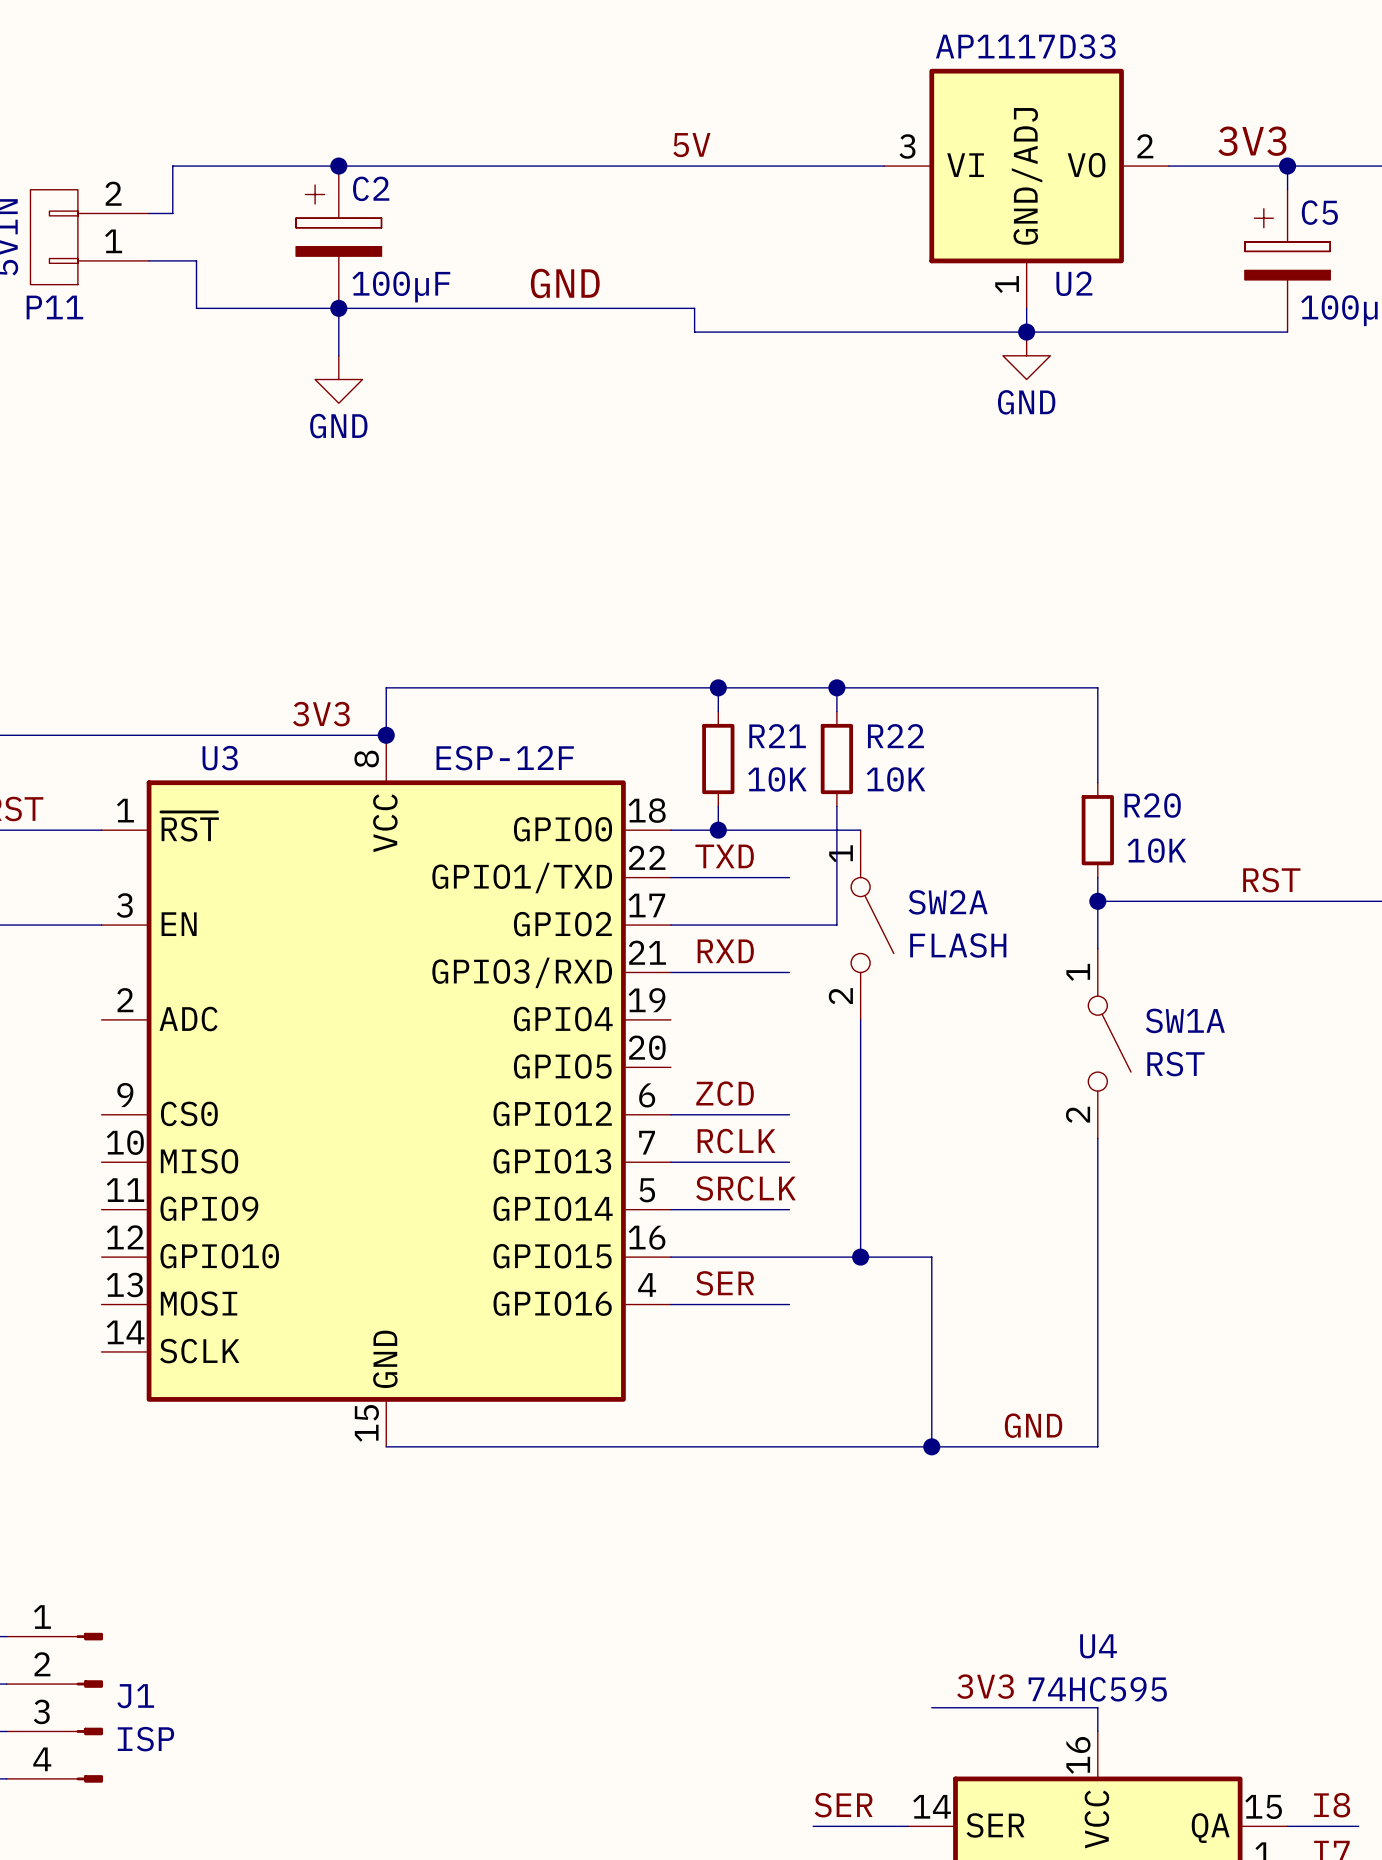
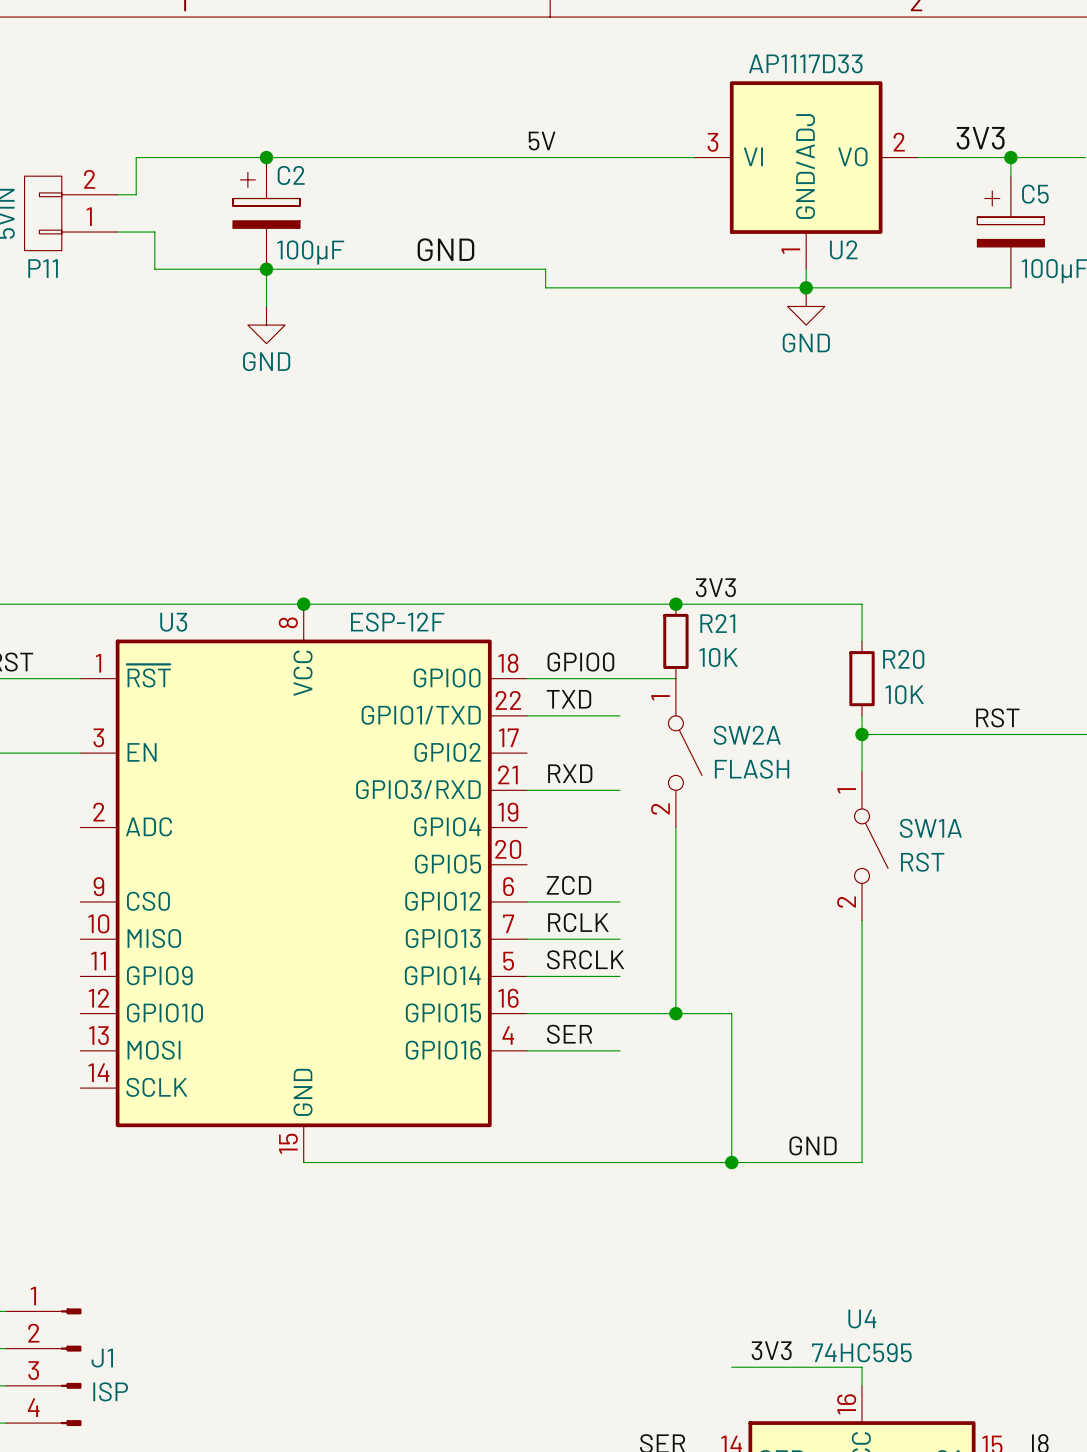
wire: (718, 687) (718, 711) -> none
junction: (718, 687) -> none
wire: (836, 687) (836, 711) -> none
junction position: (836, 687) -> (675, 604)
label: 3V3 (321, 714) -> none
label: none -> 3V3 (715, 587)
wire: (386, 735) (386, 687) (1097, 687) (1097, 735) -> (303, 604) (862, 604)
R21 position: (718, 759) -> (675, 641)
R22: 10K (836, 759) -> none
wire: (836, 806) (836, 925) (670, 925) -> none
label: none -> GPIO0 (580, 662)
junction: (718, 830) -> none

